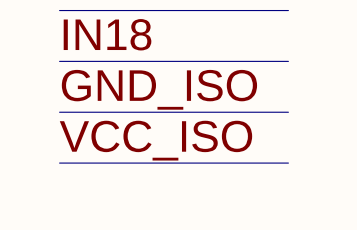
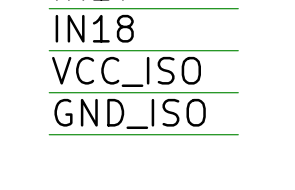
label: GND_ISO (159, 89) -> VCC_ISO (126, 71)
label: VCC_ISO (155, 140) -> GND_ISO (130, 113)

